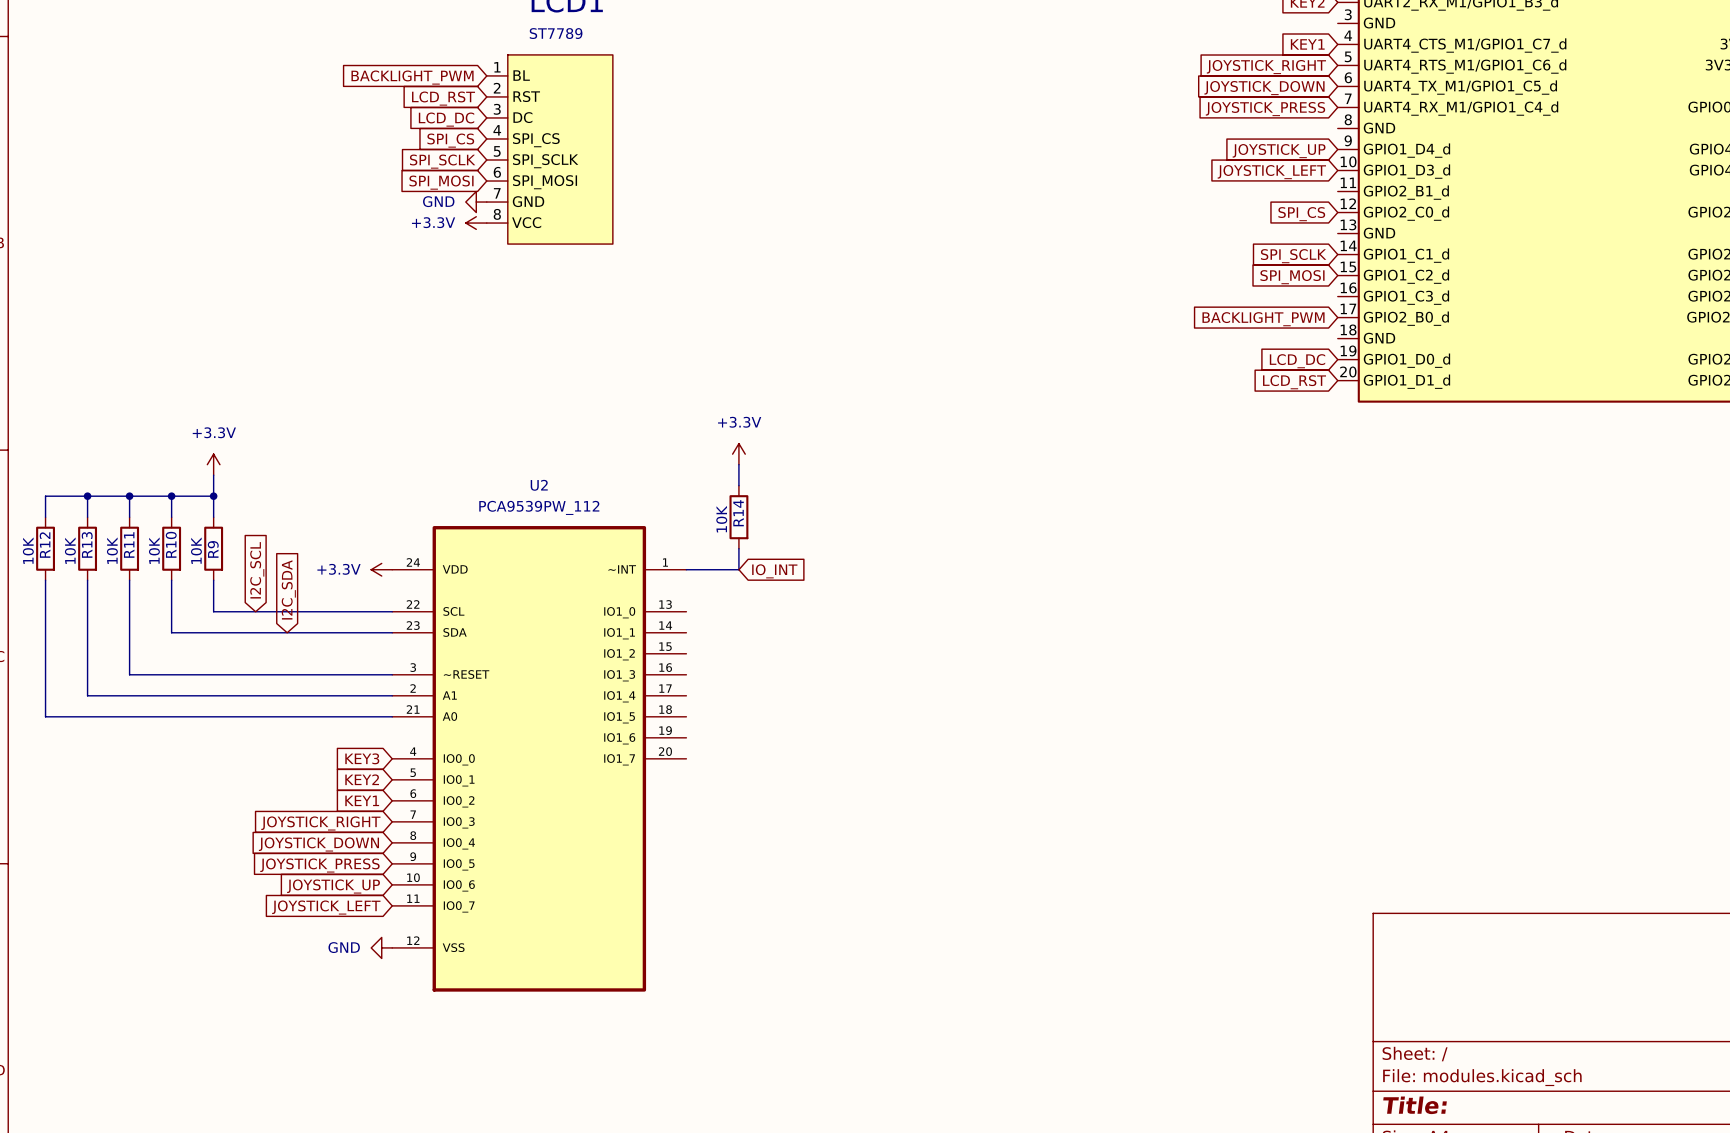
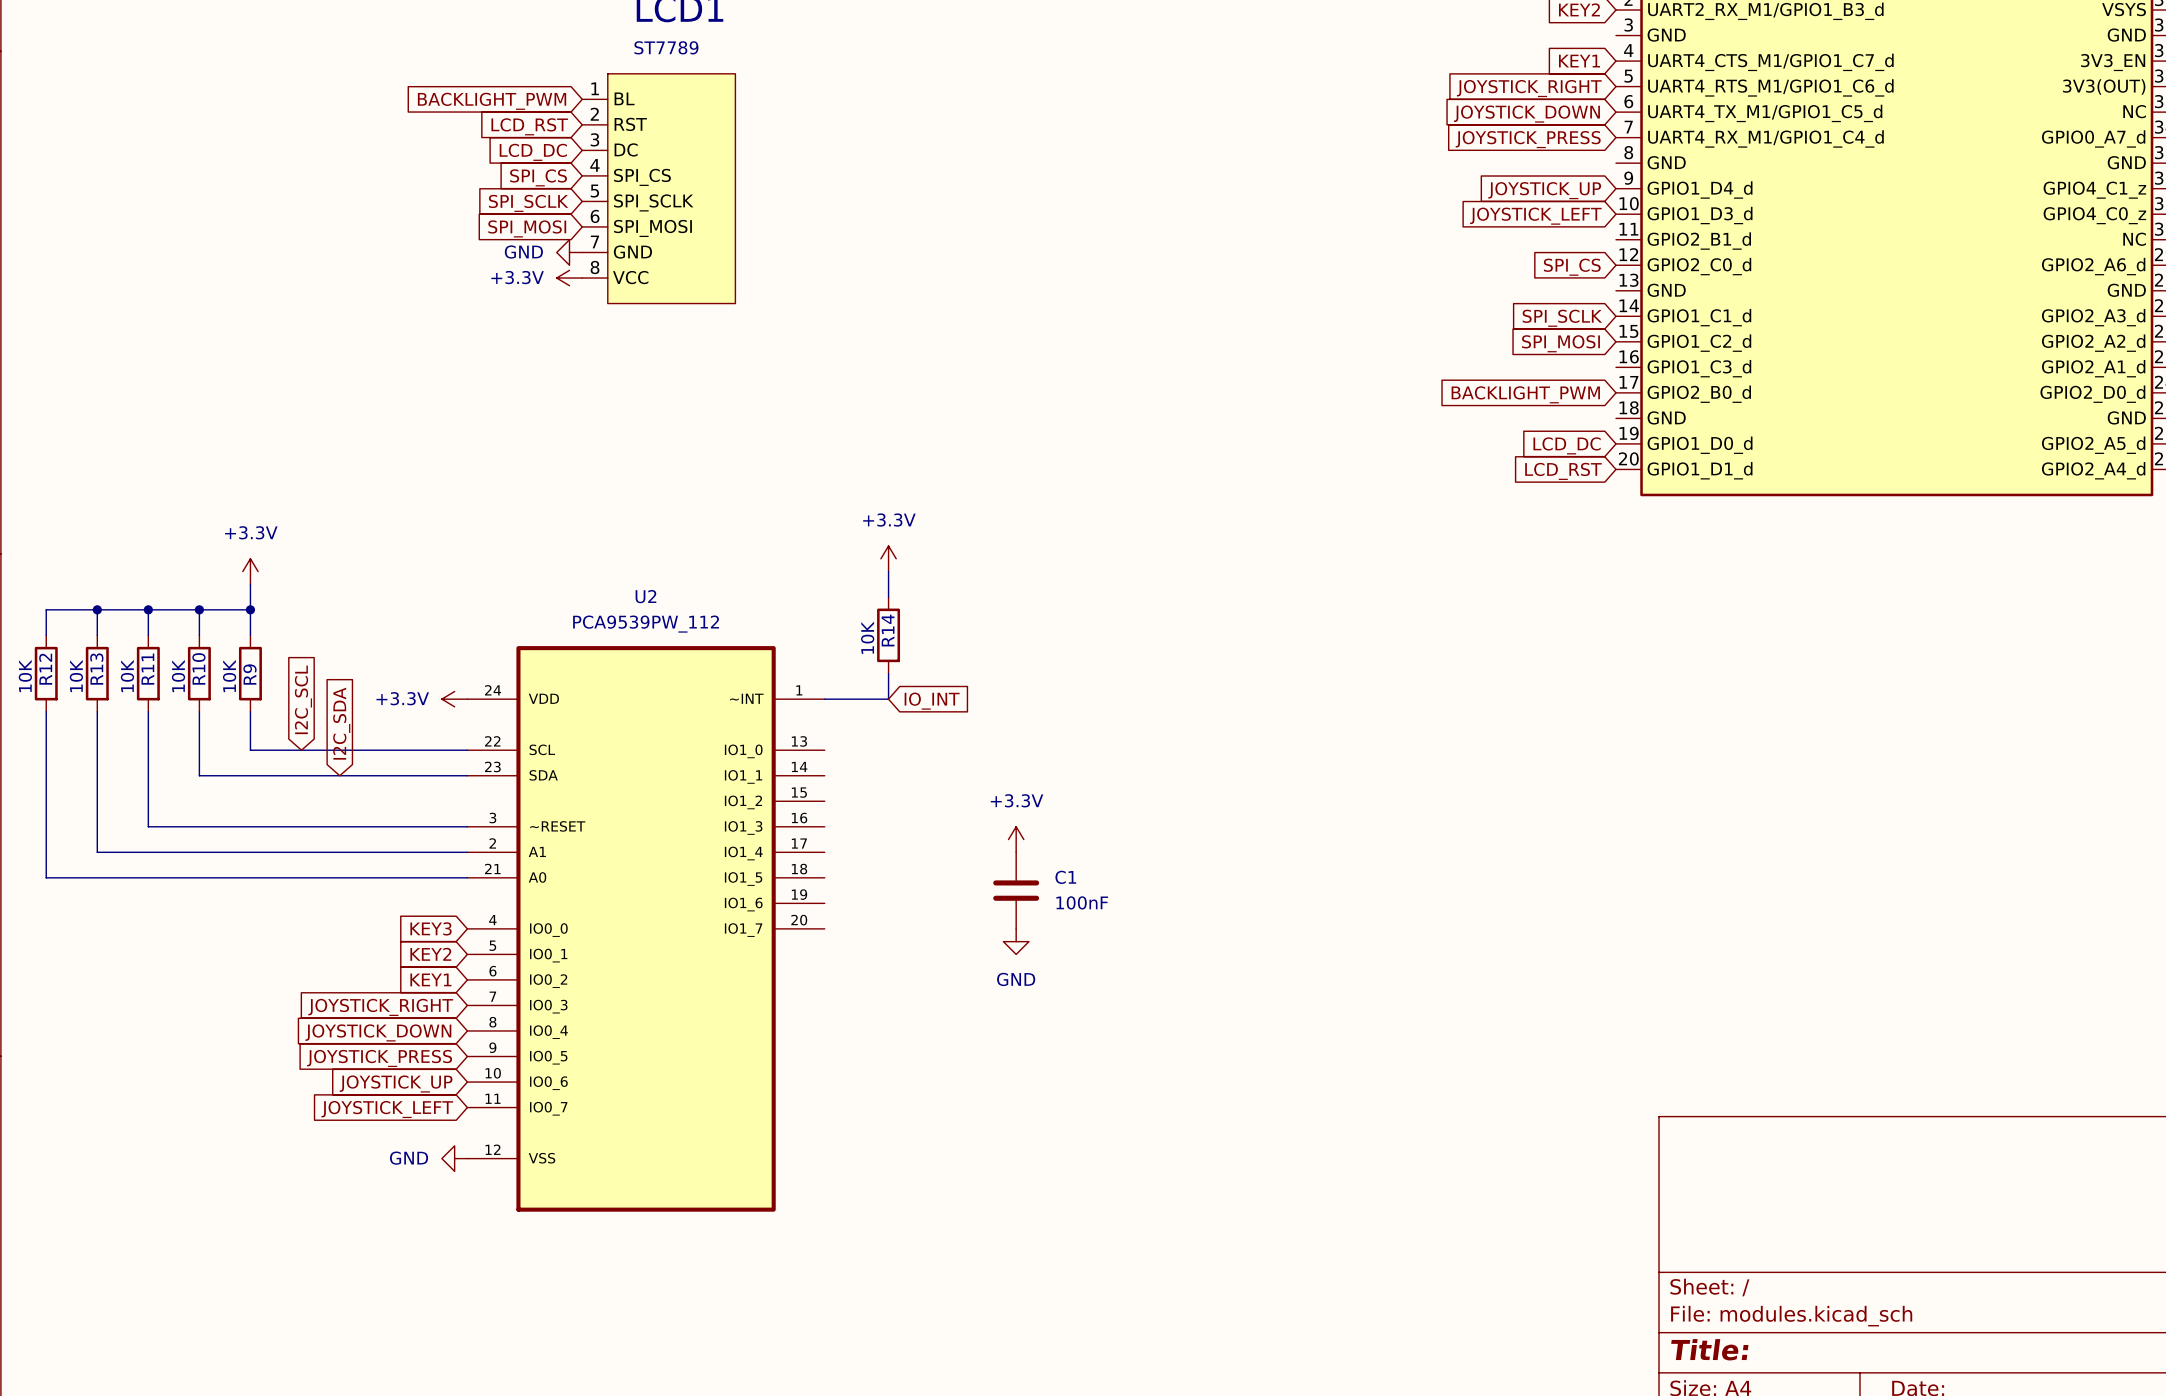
power symbol: none -> +3.3V (1016, 839)
C1: none -> 100nF (1016, 890)
power symbol: none -> GND (1016, 941)

